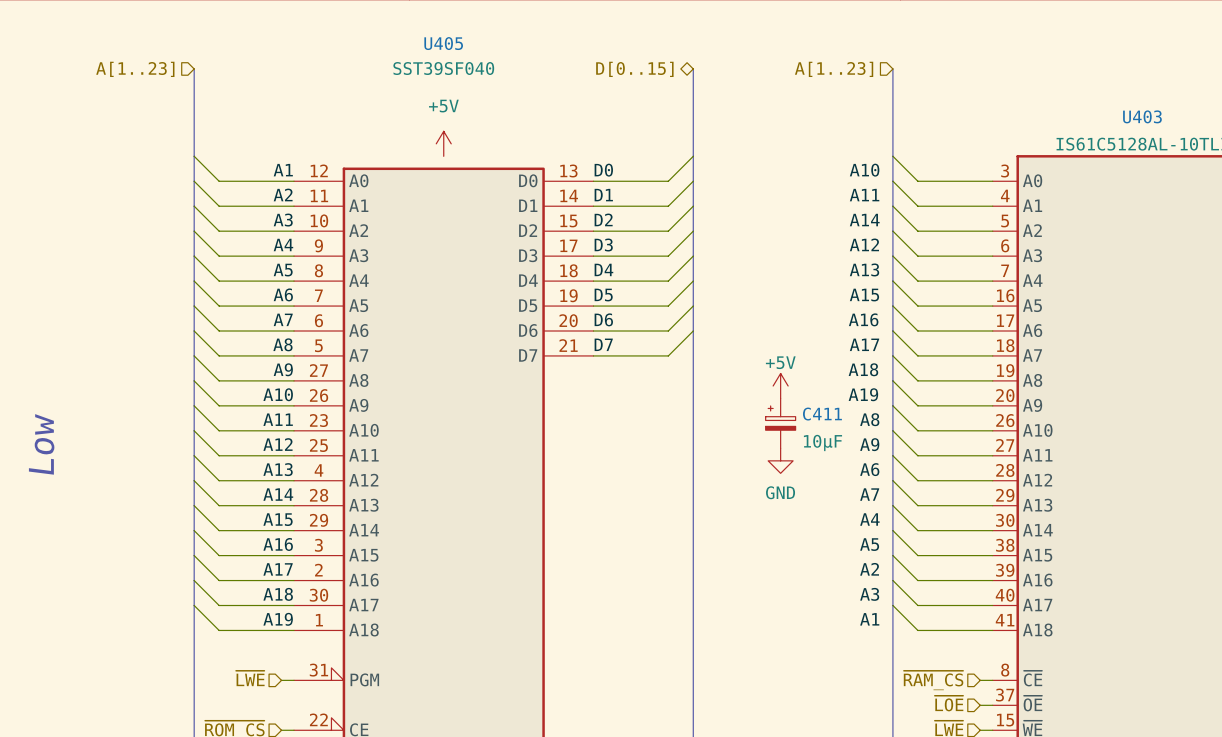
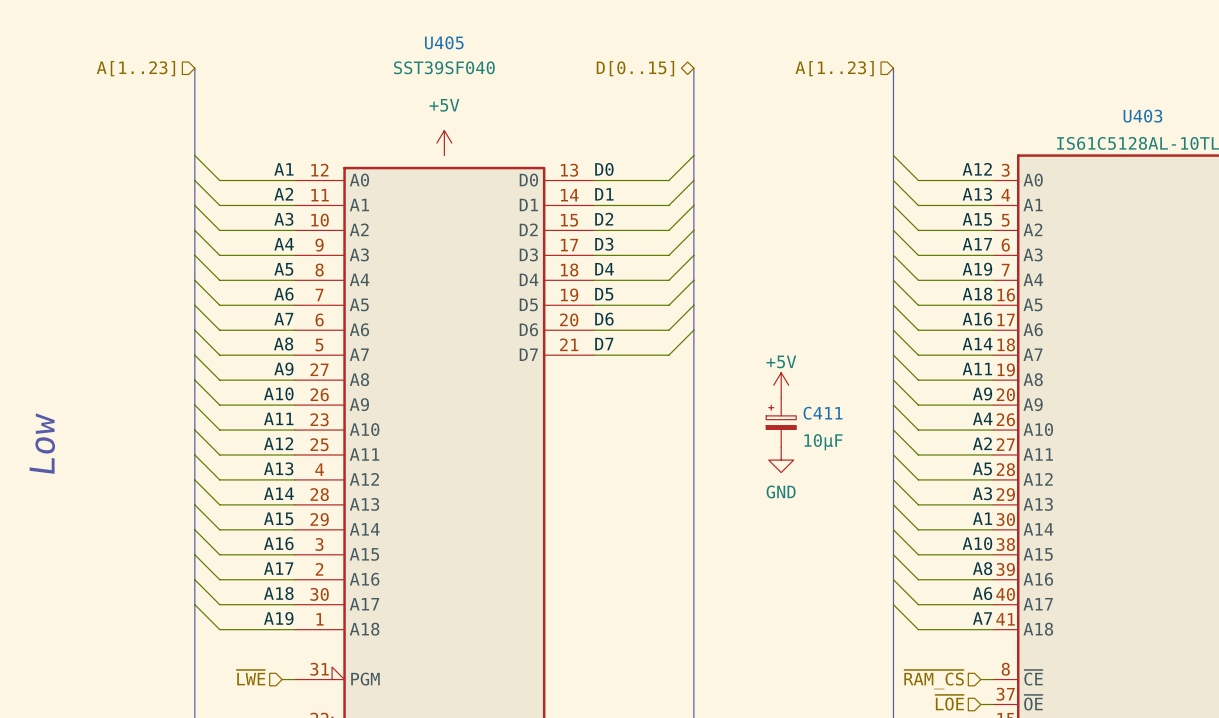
label: A10 (864, 170) -> none
label position: A11 (864, 195) -> A11 (977, 369)
label position: A14 (864, 220) -> A14 (977, 344)
label position: A12 (864, 244) -> A12 (977, 169)
label position: A13 (864, 269) -> A13 (977, 194)
label position: A15 (864, 295) -> A15 (977, 219)
label position: A16 (863, 319) -> A16 (977, 319)
label position: A17 (864, 344) -> A17 (977, 244)
label position: A18 (863, 369) -> A18 (977, 294)
label position: A19 (863, 394) -> A19 (977, 269)
label position: A8 (869, 419) -> A8 (982, 568)
label position: A9 (869, 444) -> A9 (982, 393)
label position: A6 (869, 469) -> A6 (982, 593)
label position: A7 (869, 494) -> A7 (982, 618)
label position: A4 (869, 519) -> A4 (982, 418)
label position: A5 (869, 544) -> A5 (982, 468)
label: none -> A10 (977, 543)
label position: A2 (869, 569) -> A2 (982, 443)
label position: A3 (869, 594) -> A3 (982, 493)
label position: A1 (869, 619) -> A1 (982, 518)

